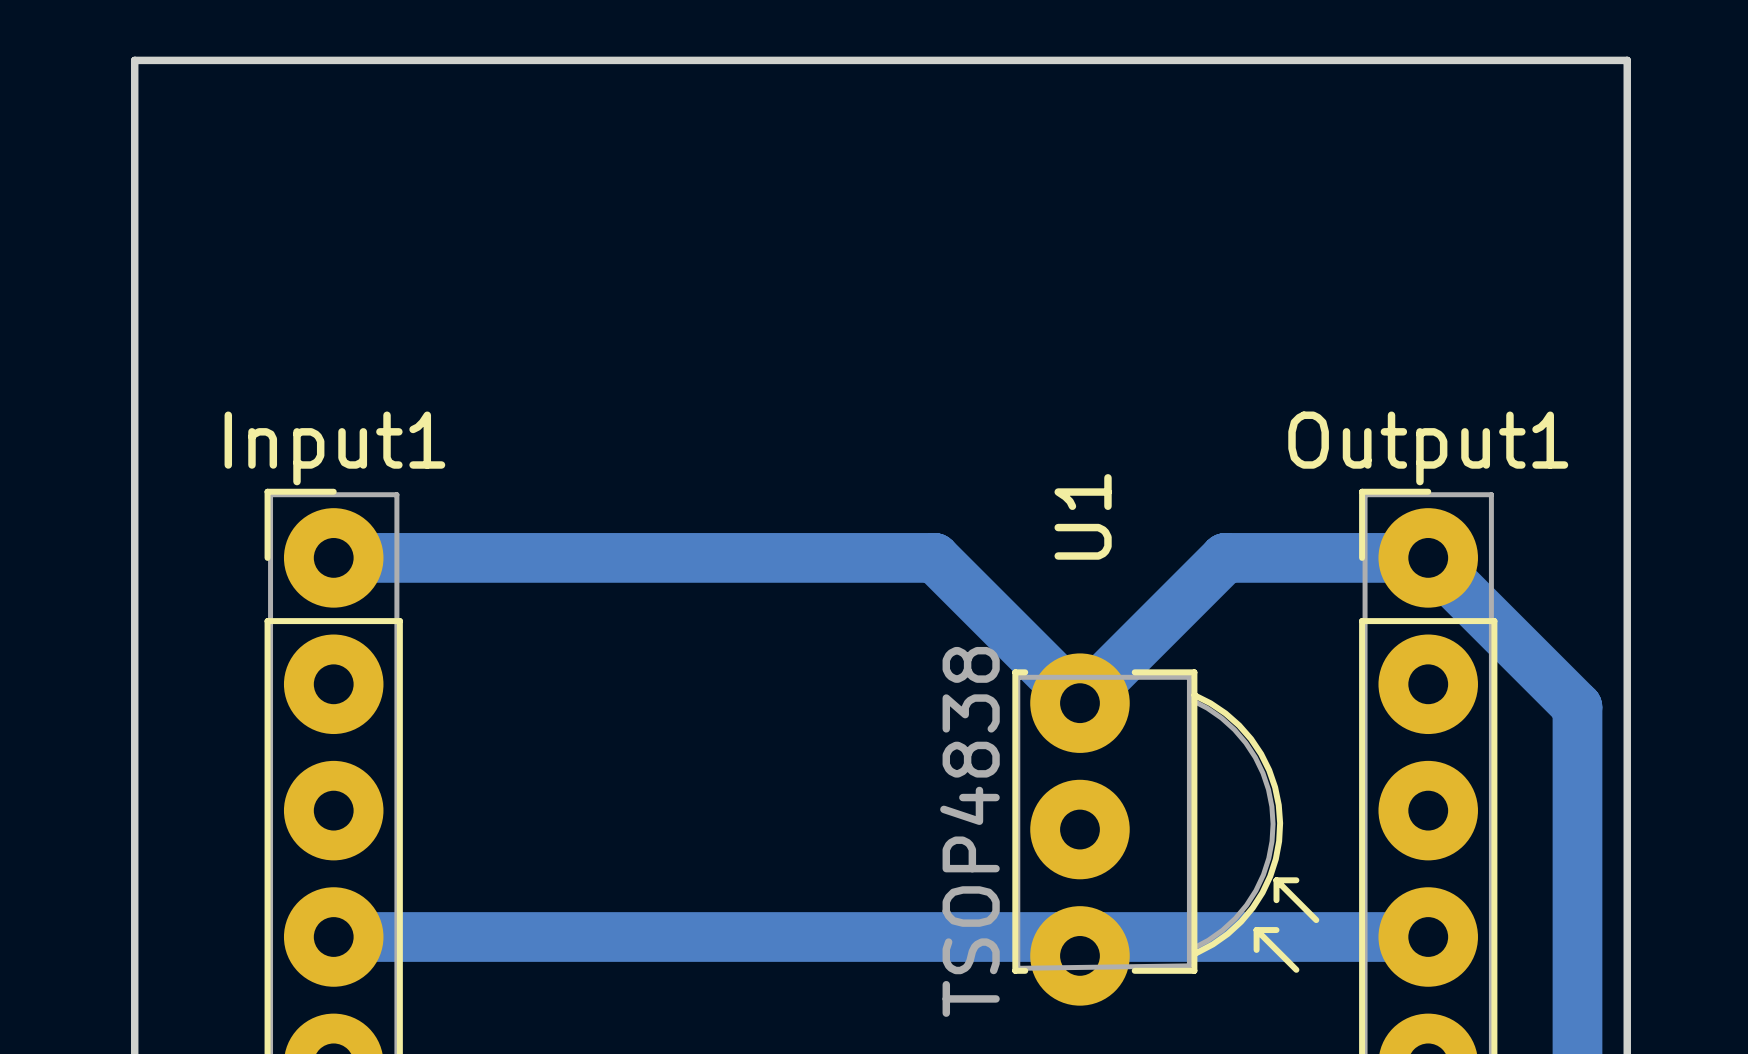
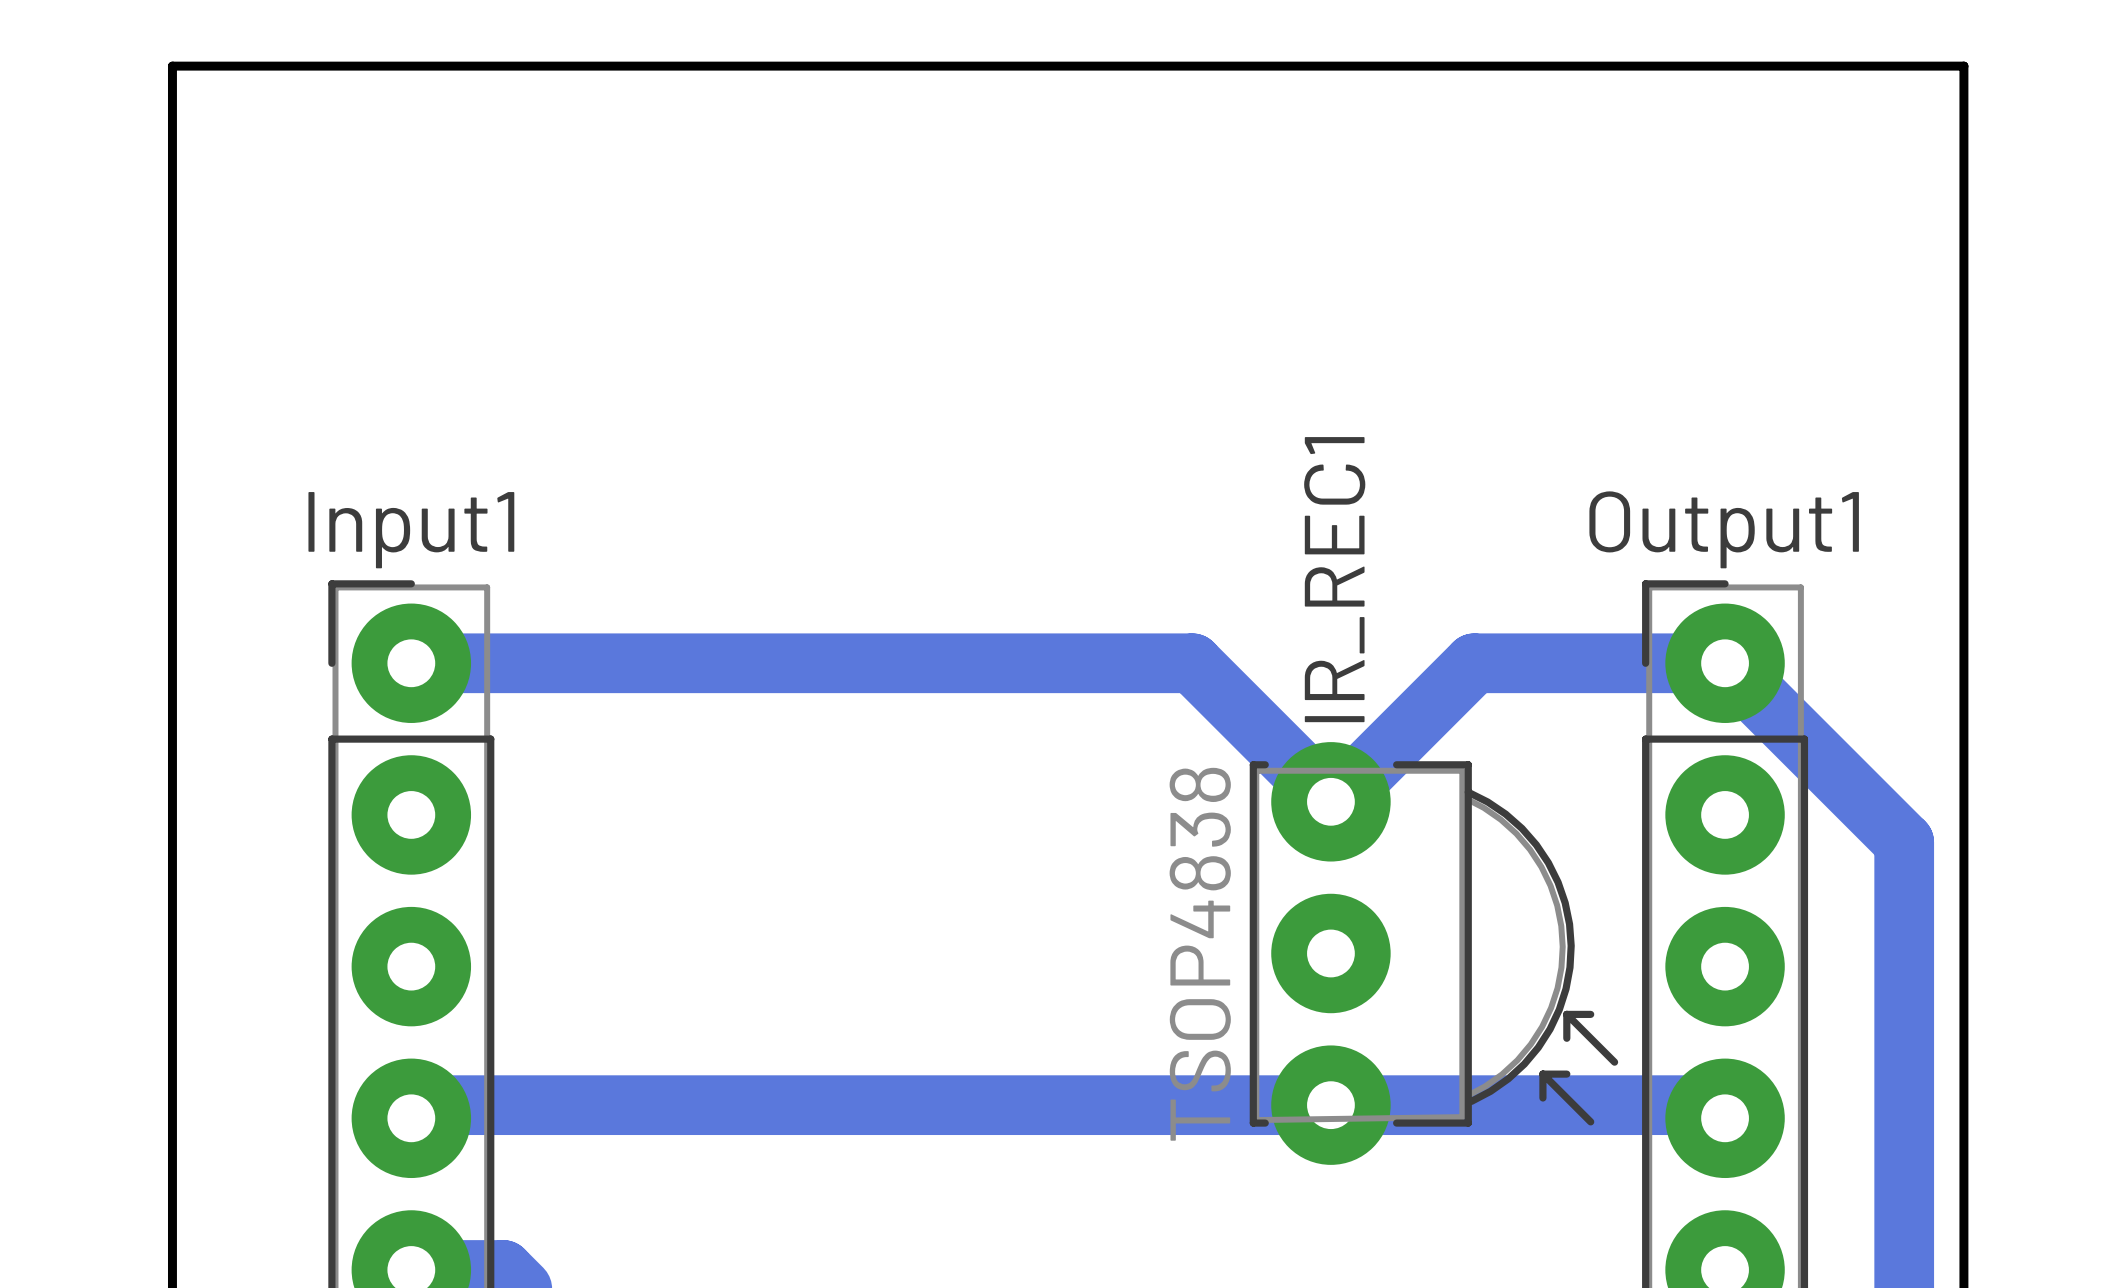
U1 name: U1 (1083, 516) -> IR_REC1 (1334, 579)
bottom track: (934, 557) (1079, 703) (1225, 557) -> (1132, 663) (1192, 663) (1330, 801) (1335, 801) (1474, 663) (1481, 663)
U1 position: (1165, 829) -> (1433, 953)
bottom track: (333, 937) (1061, 937) -> (411, 1118) (424, 1105) (1711, 1105) (1725, 1118)
bottom track: (1428, 937) (1098, 937) (1079, 955) -> none

